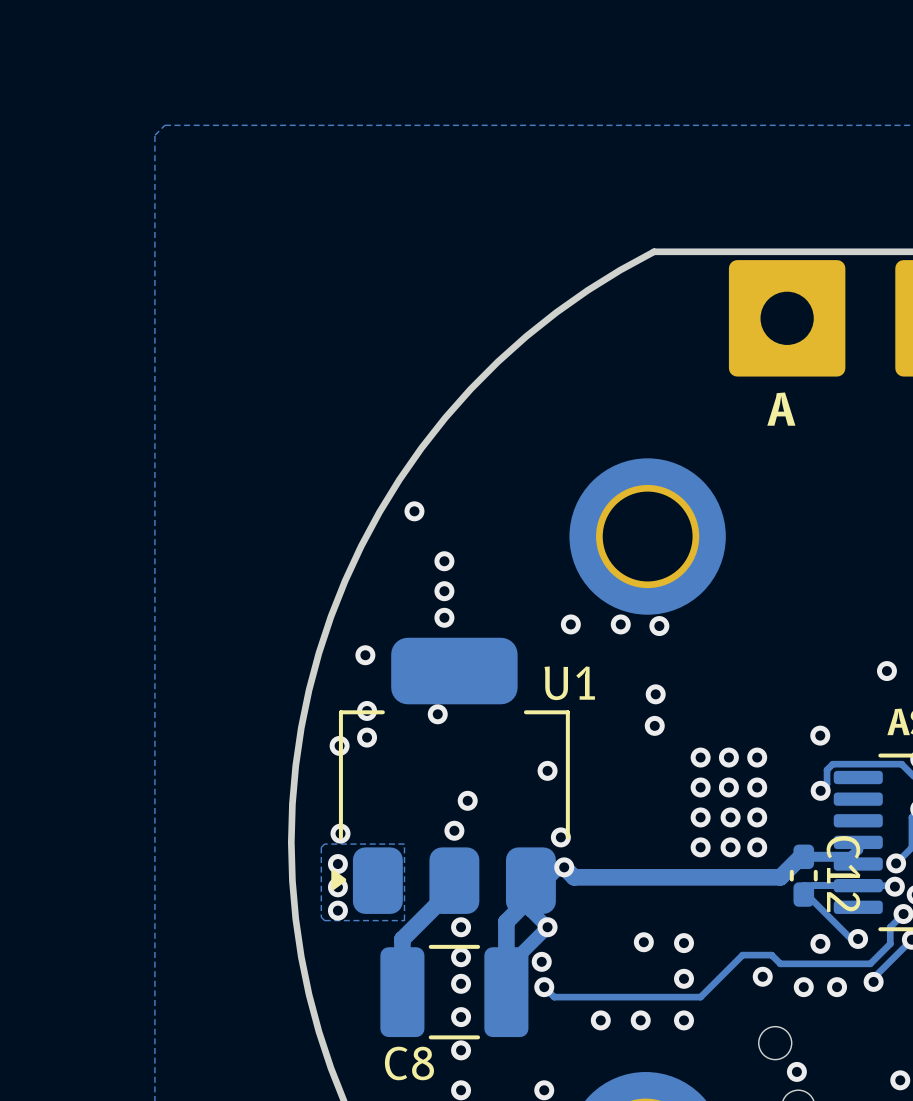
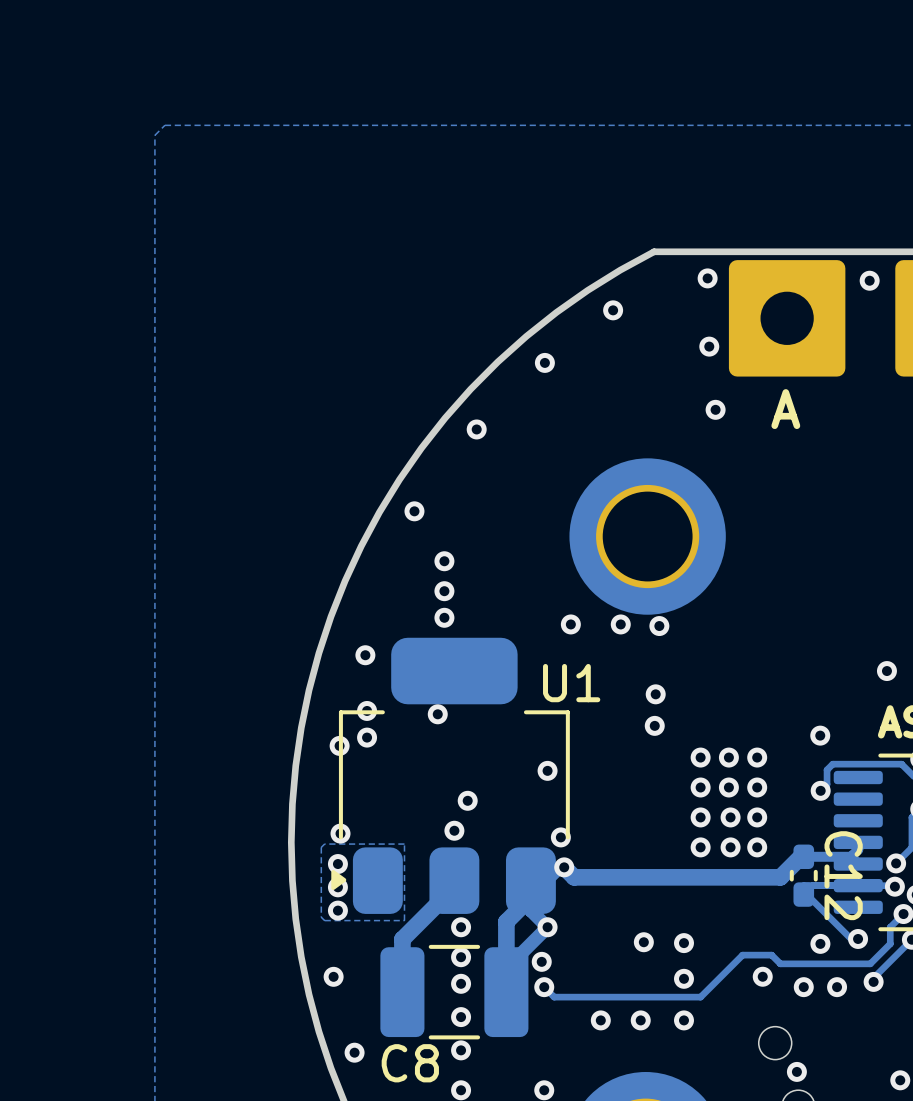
via: none -> (707, 278)
via: none -> (869, 280)
via: none -> (613, 310)
via: none -> (709, 346)
via: none -> (544, 362)
via: none -> (715, 409)
via: none -> (476, 429)
via: none -> (333, 976)
via: none -> (354, 1052)

